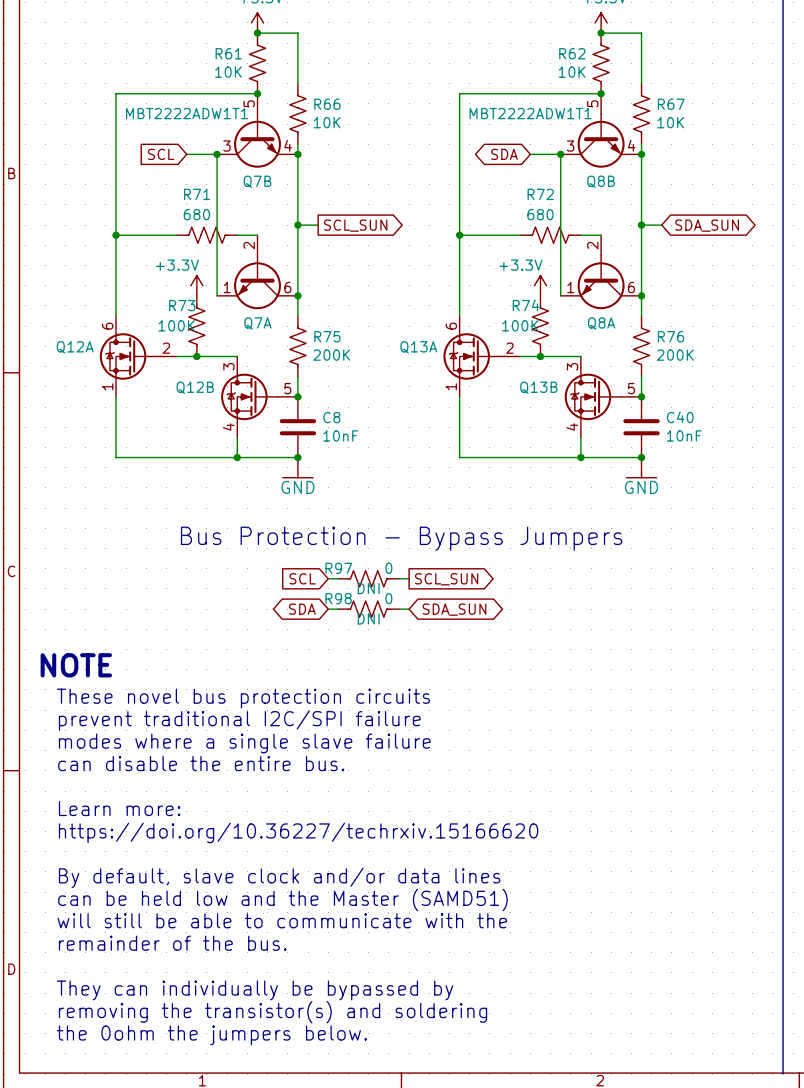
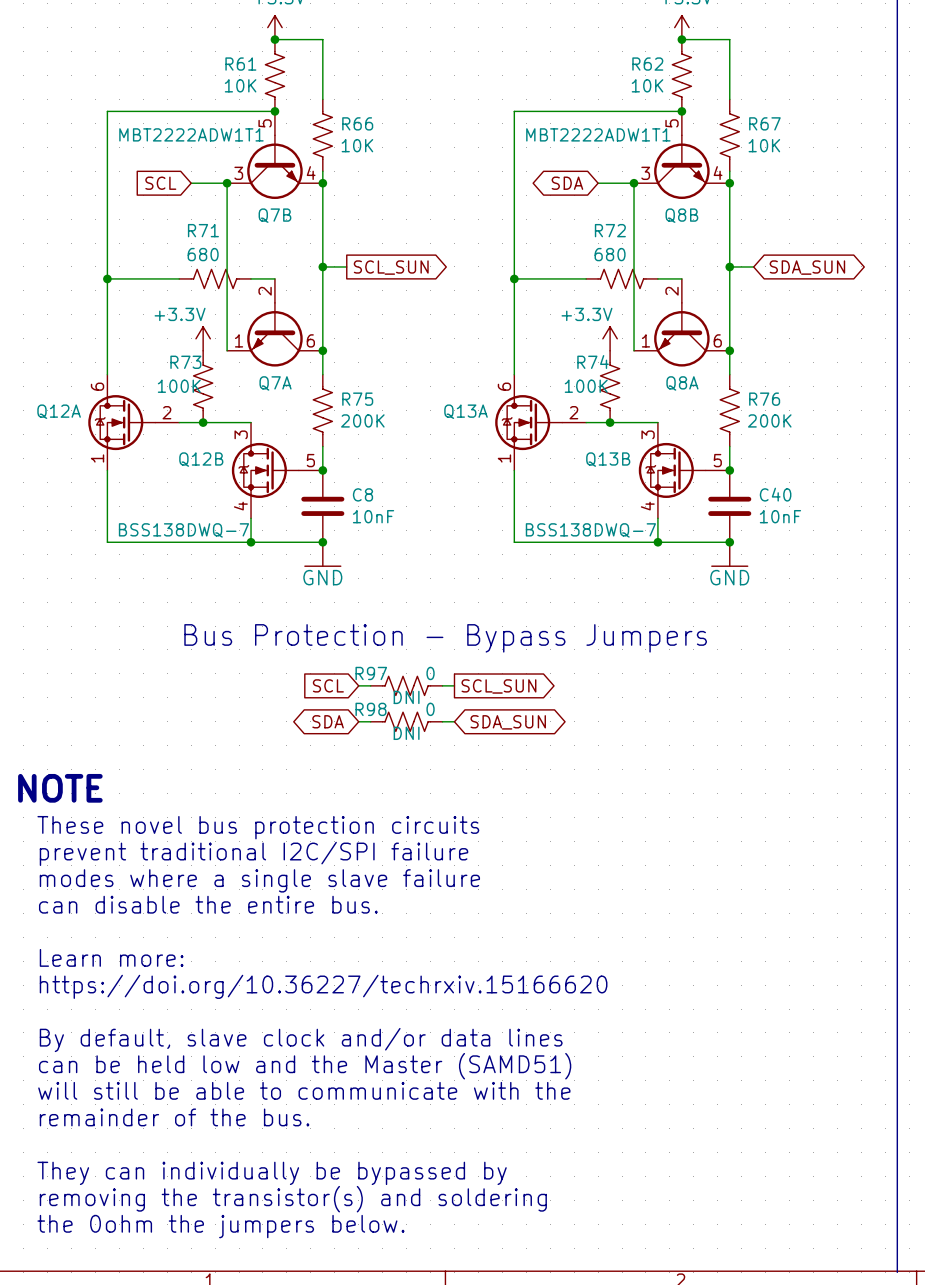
Q12A value: none -> BSS138DWQ-7 (183, 530)
Q13A value: none -> BSS138DWQ-7 (590, 530)

